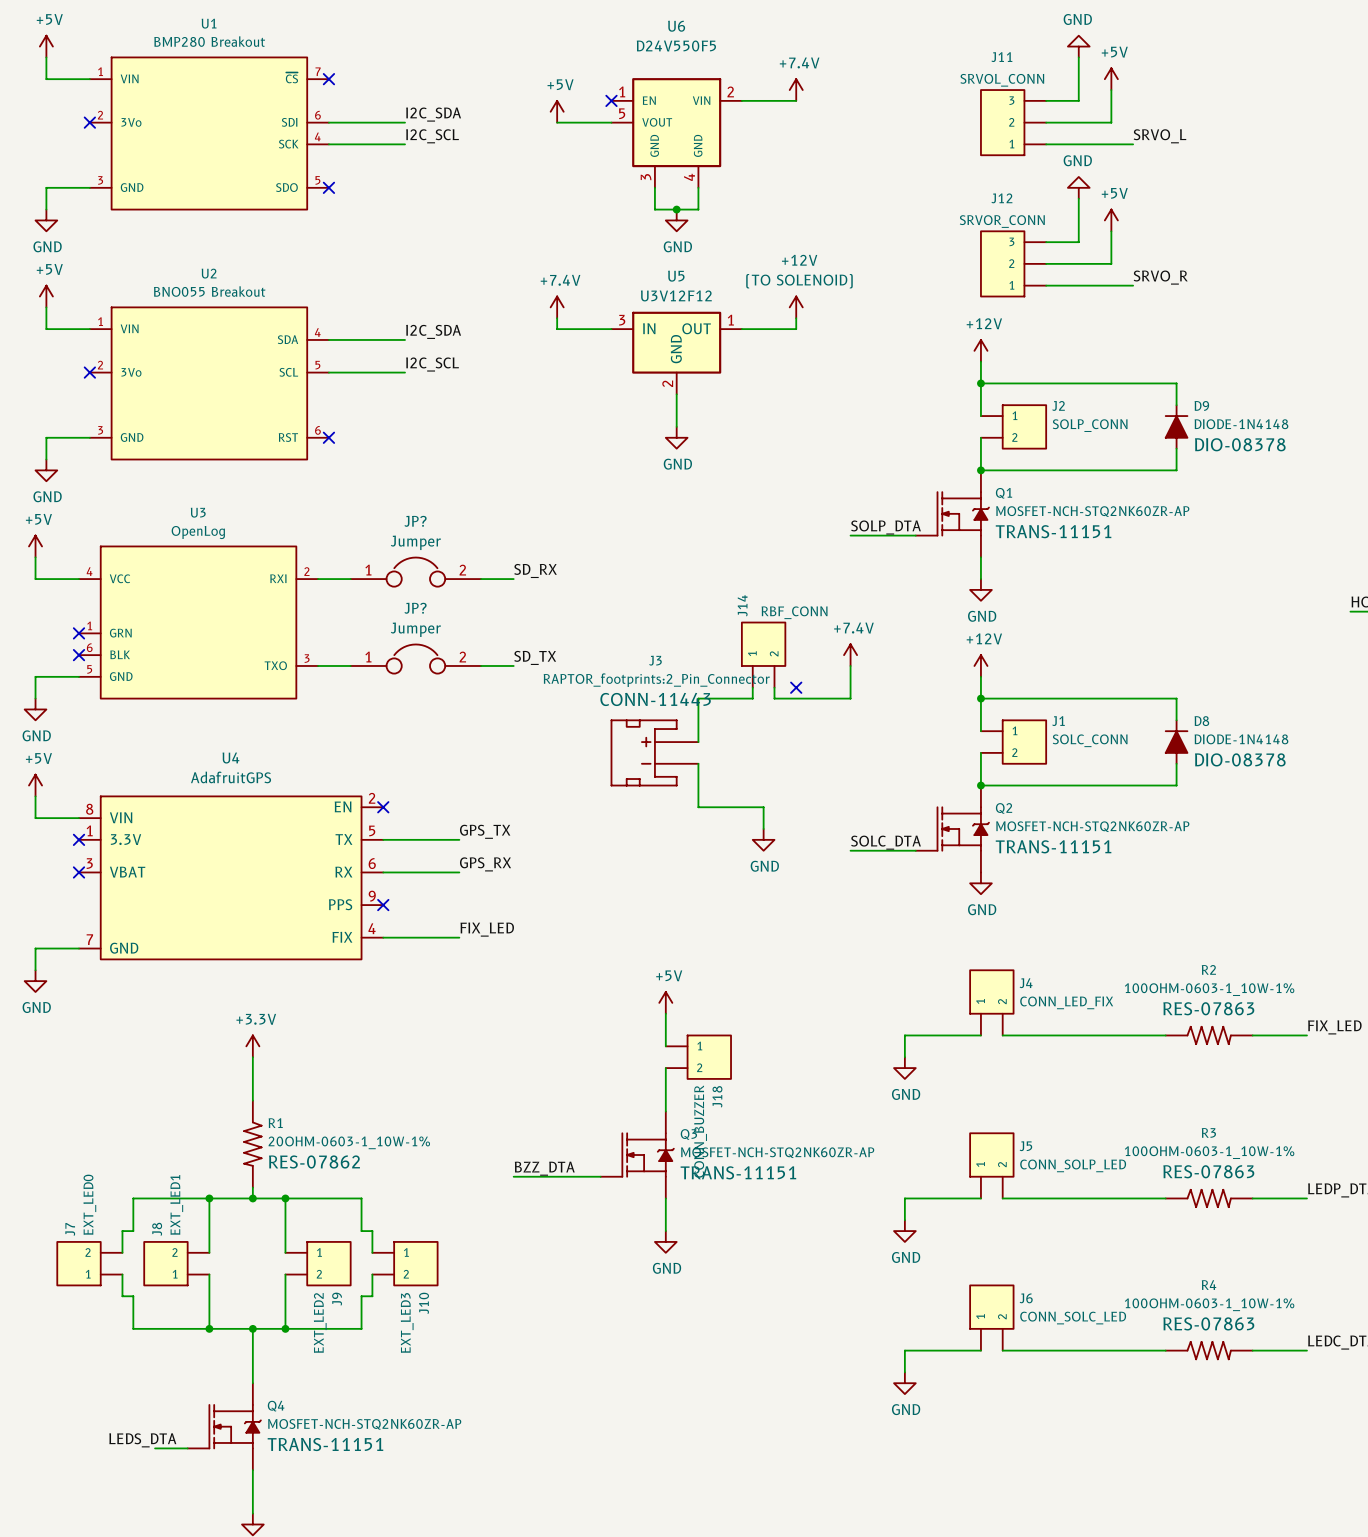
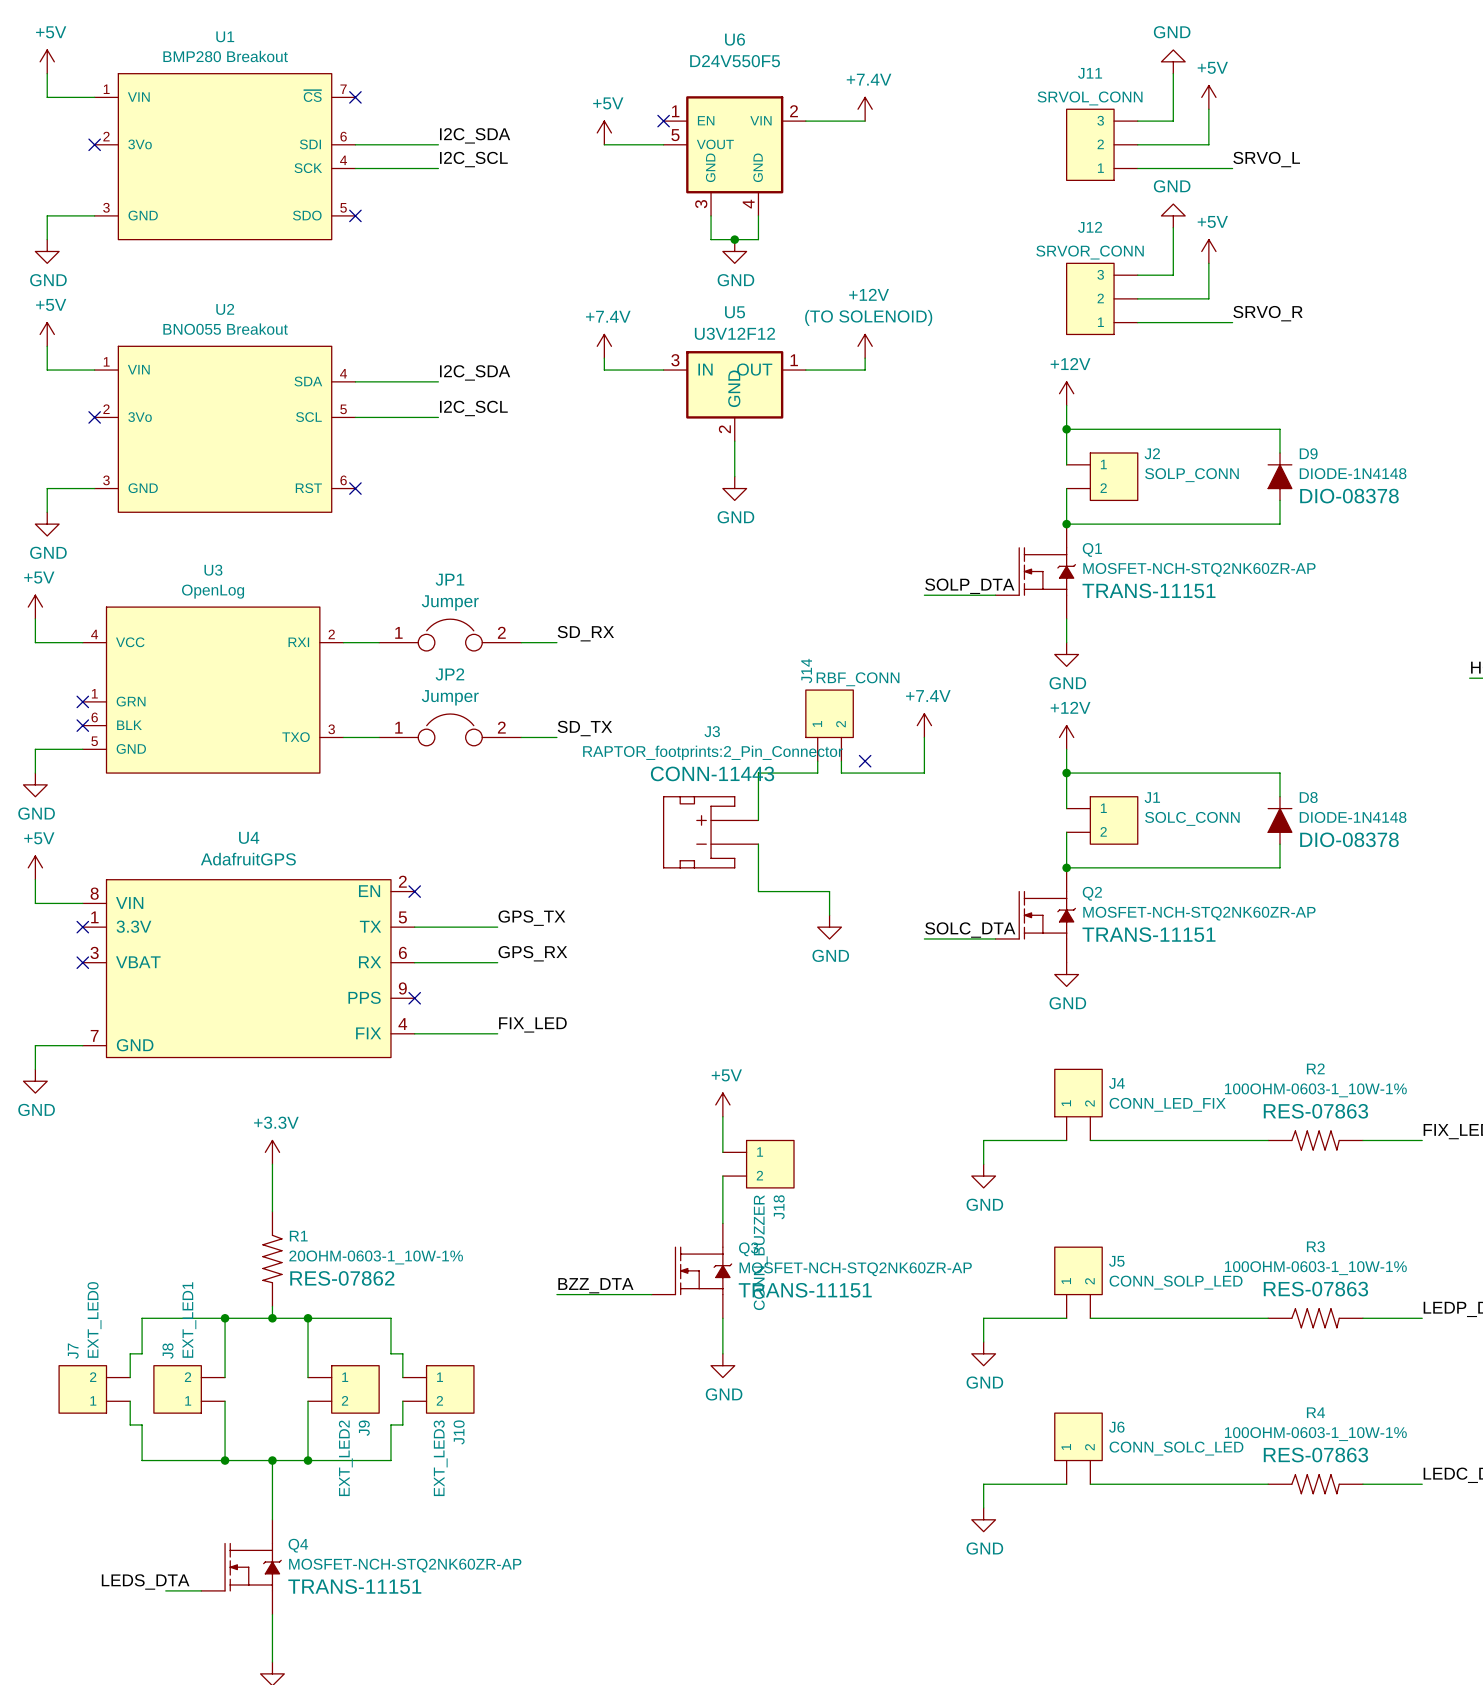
JP? name: JP? (415, 521) -> JP1 (449, 579)
JP? name: JP? (415, 608) -> JP2 (449, 674)

